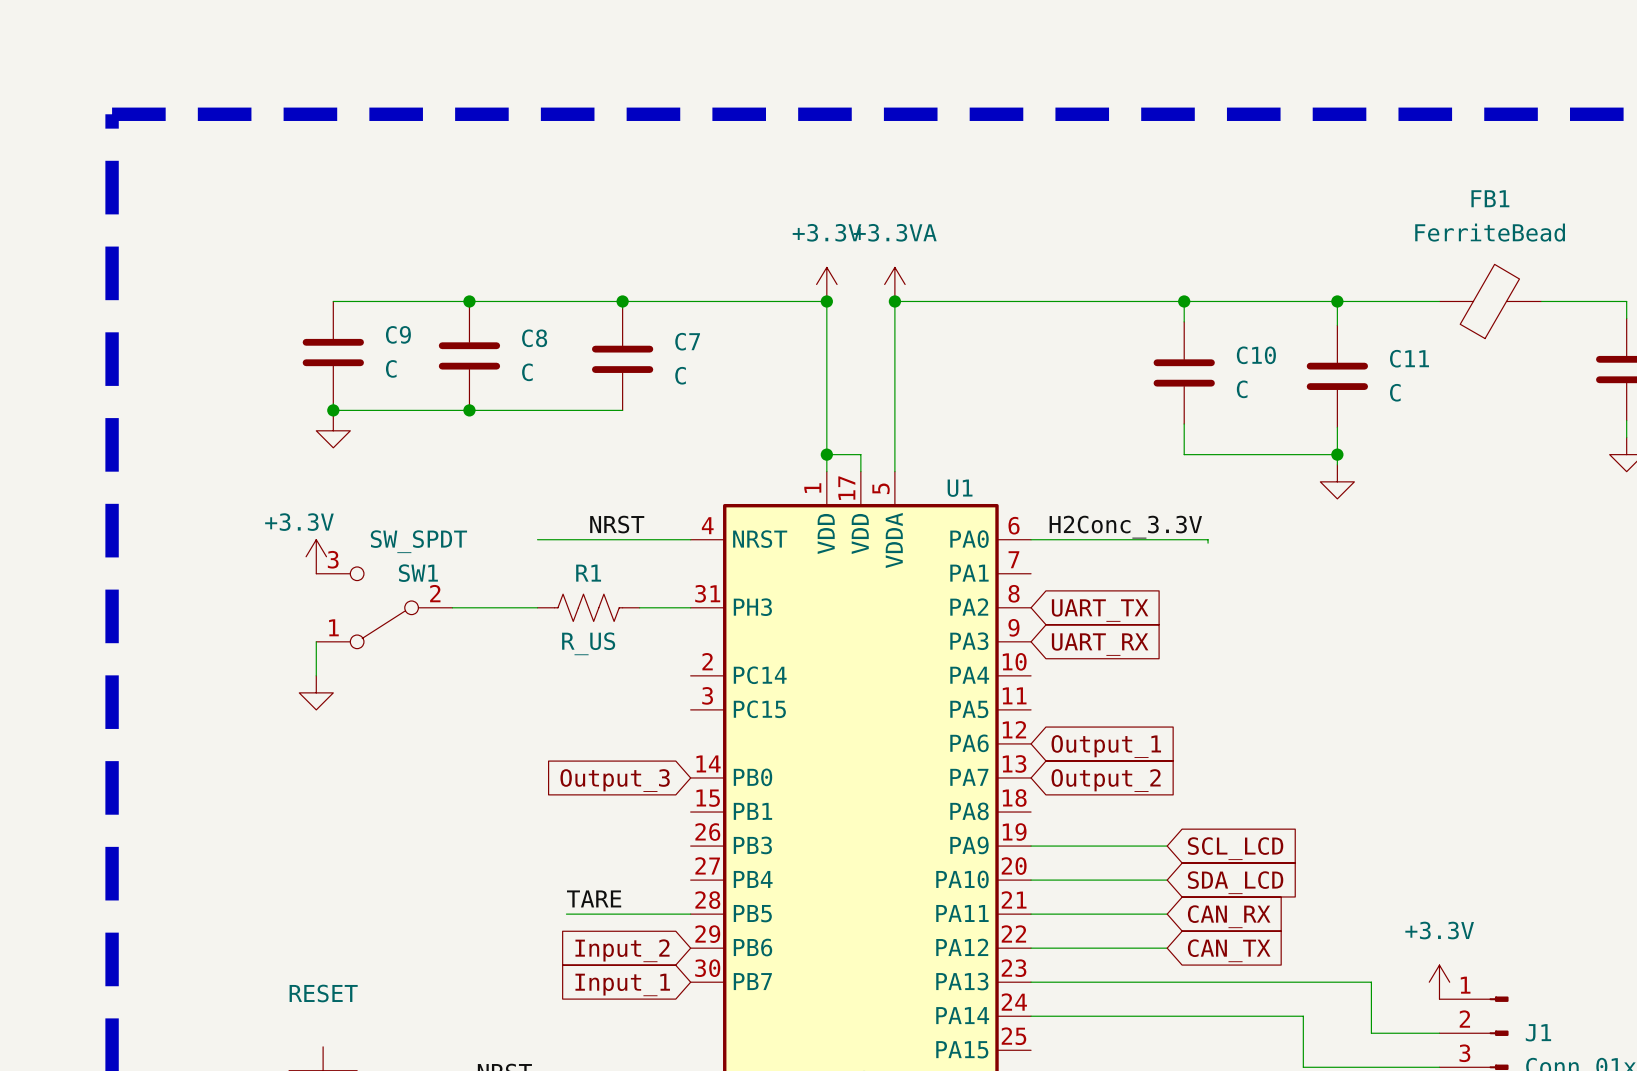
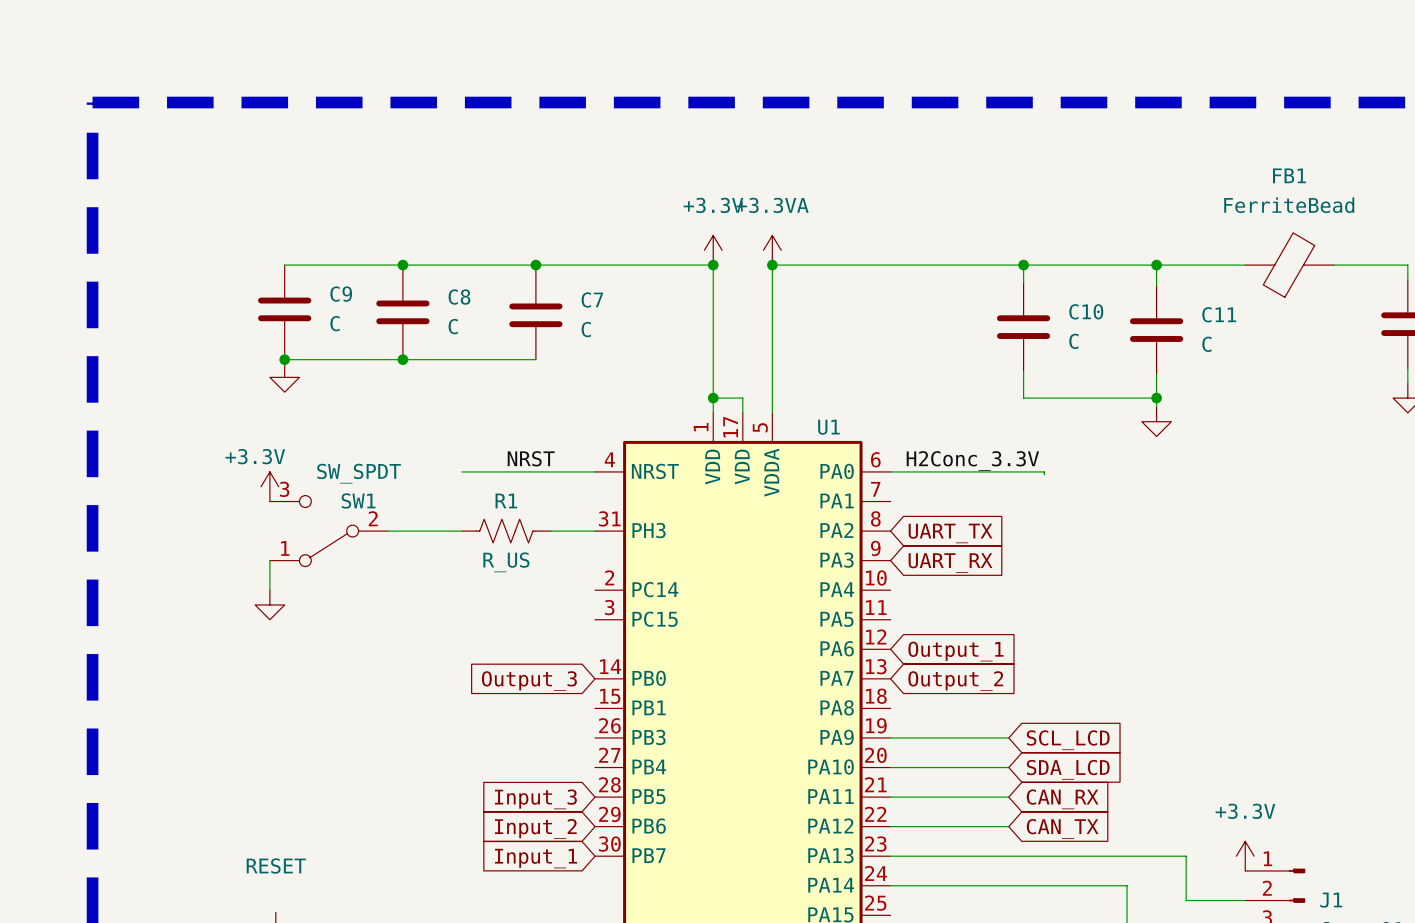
label: TARE (594, 898) -> none
wire: (566, 914) (690, 914) -> none
global label: none -> Input_3 (535, 799)

